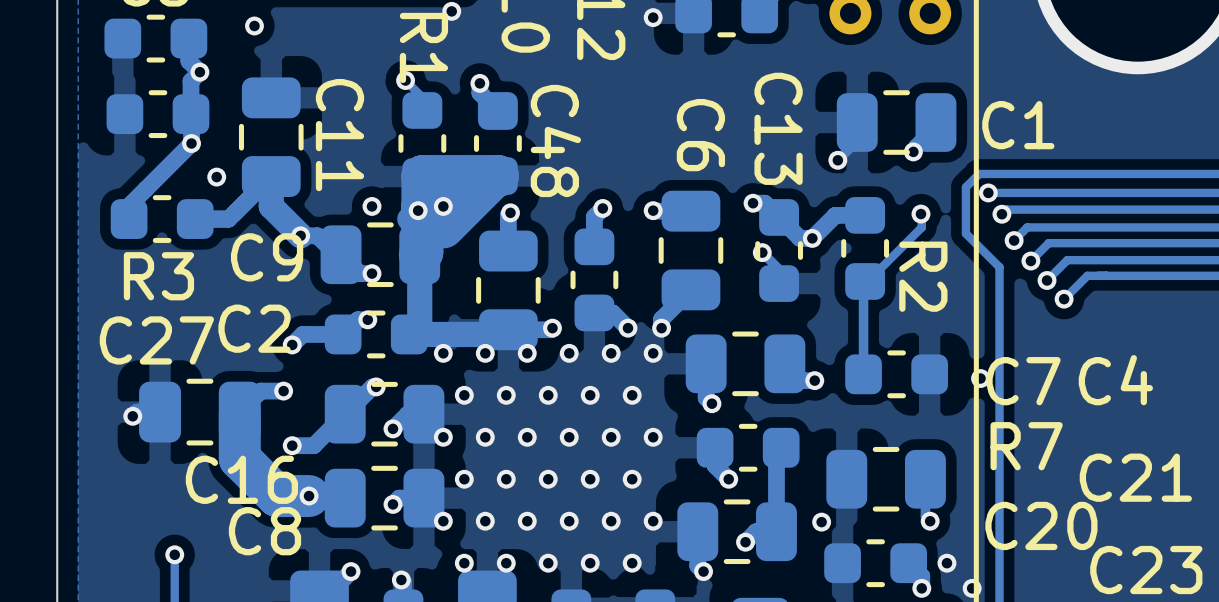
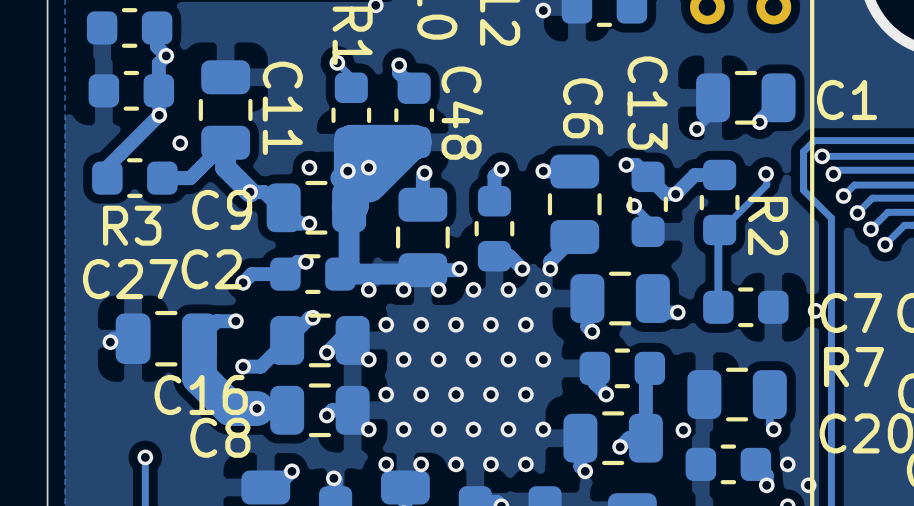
via: (254, 25) -> none

